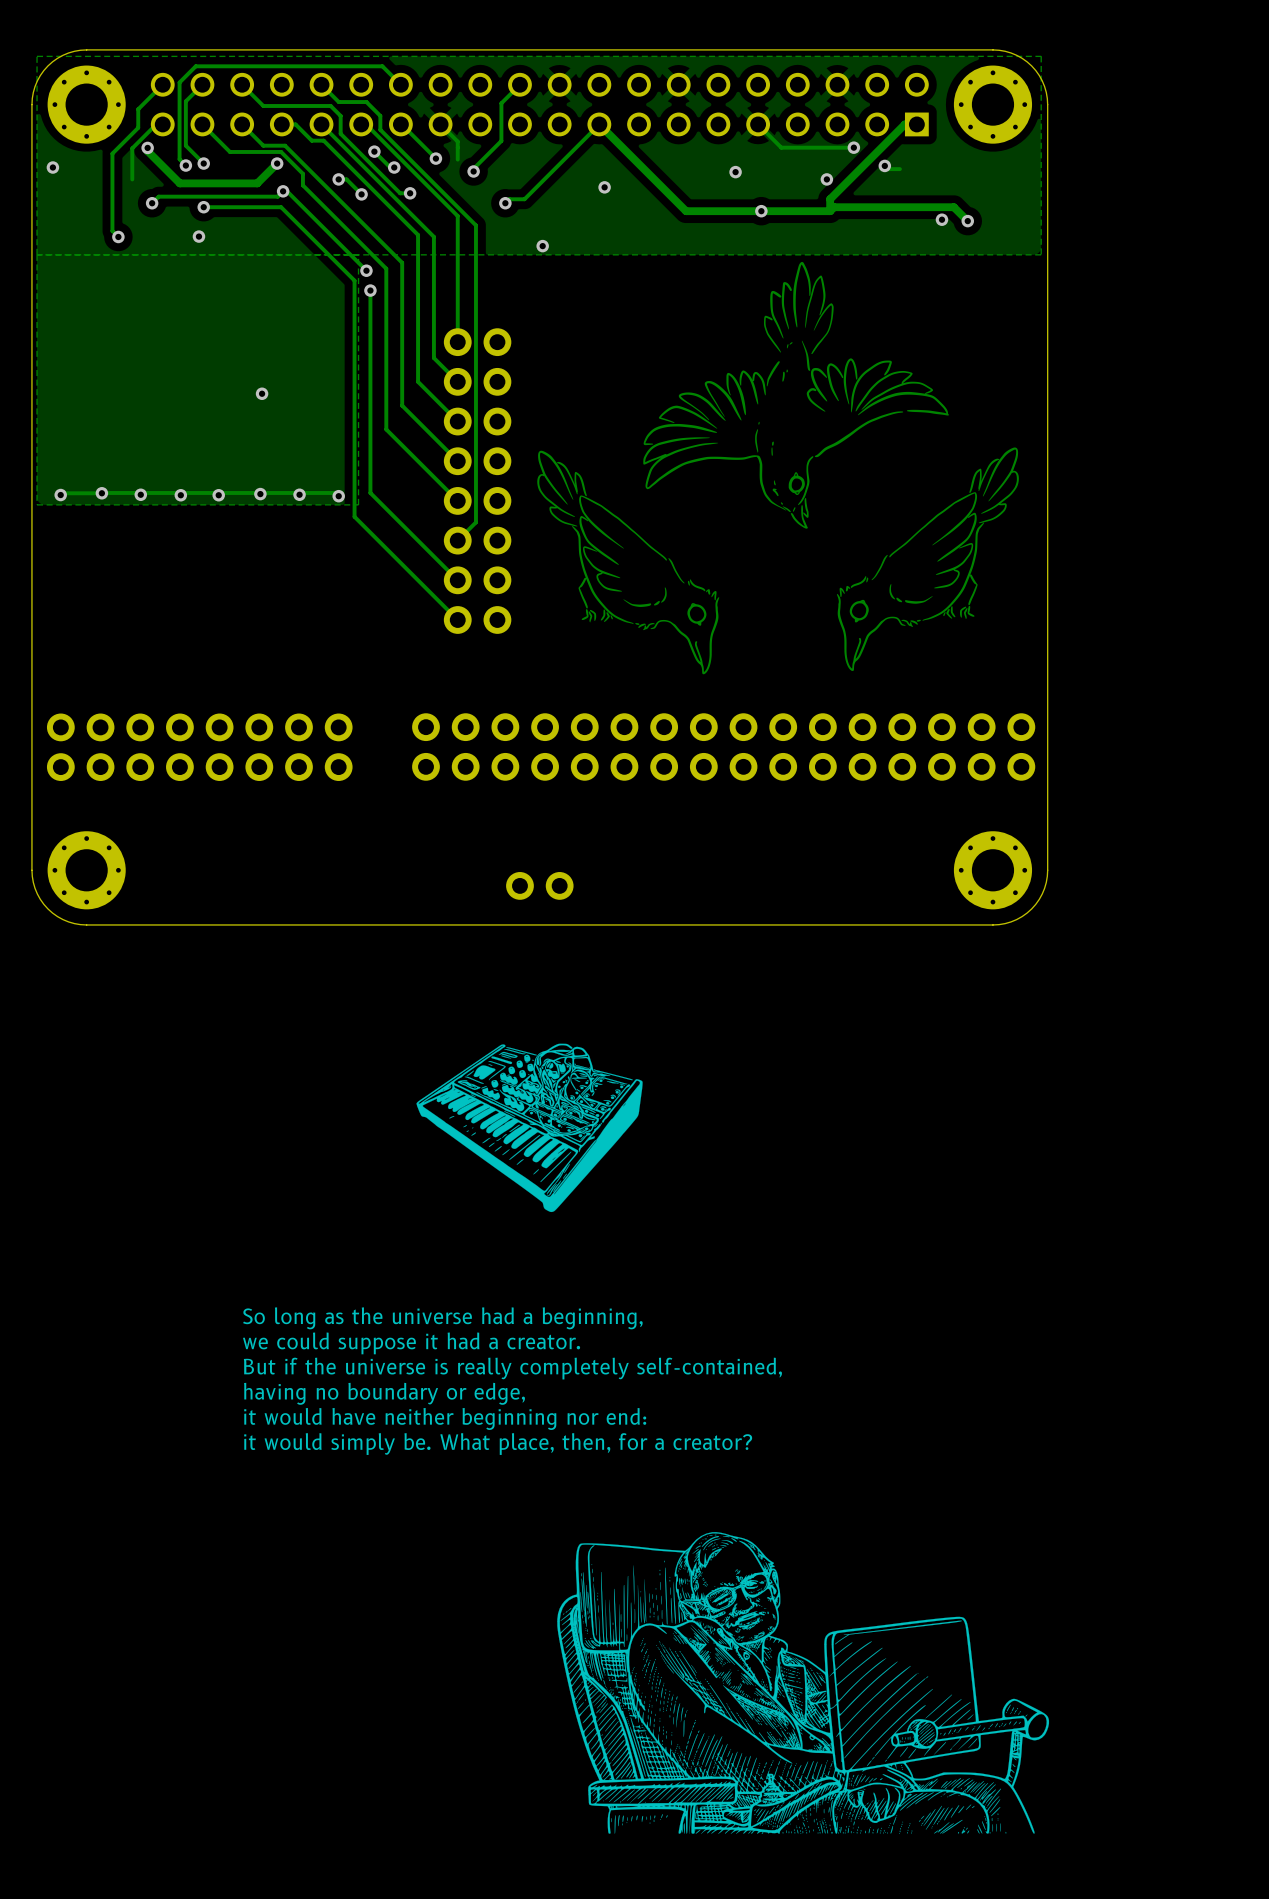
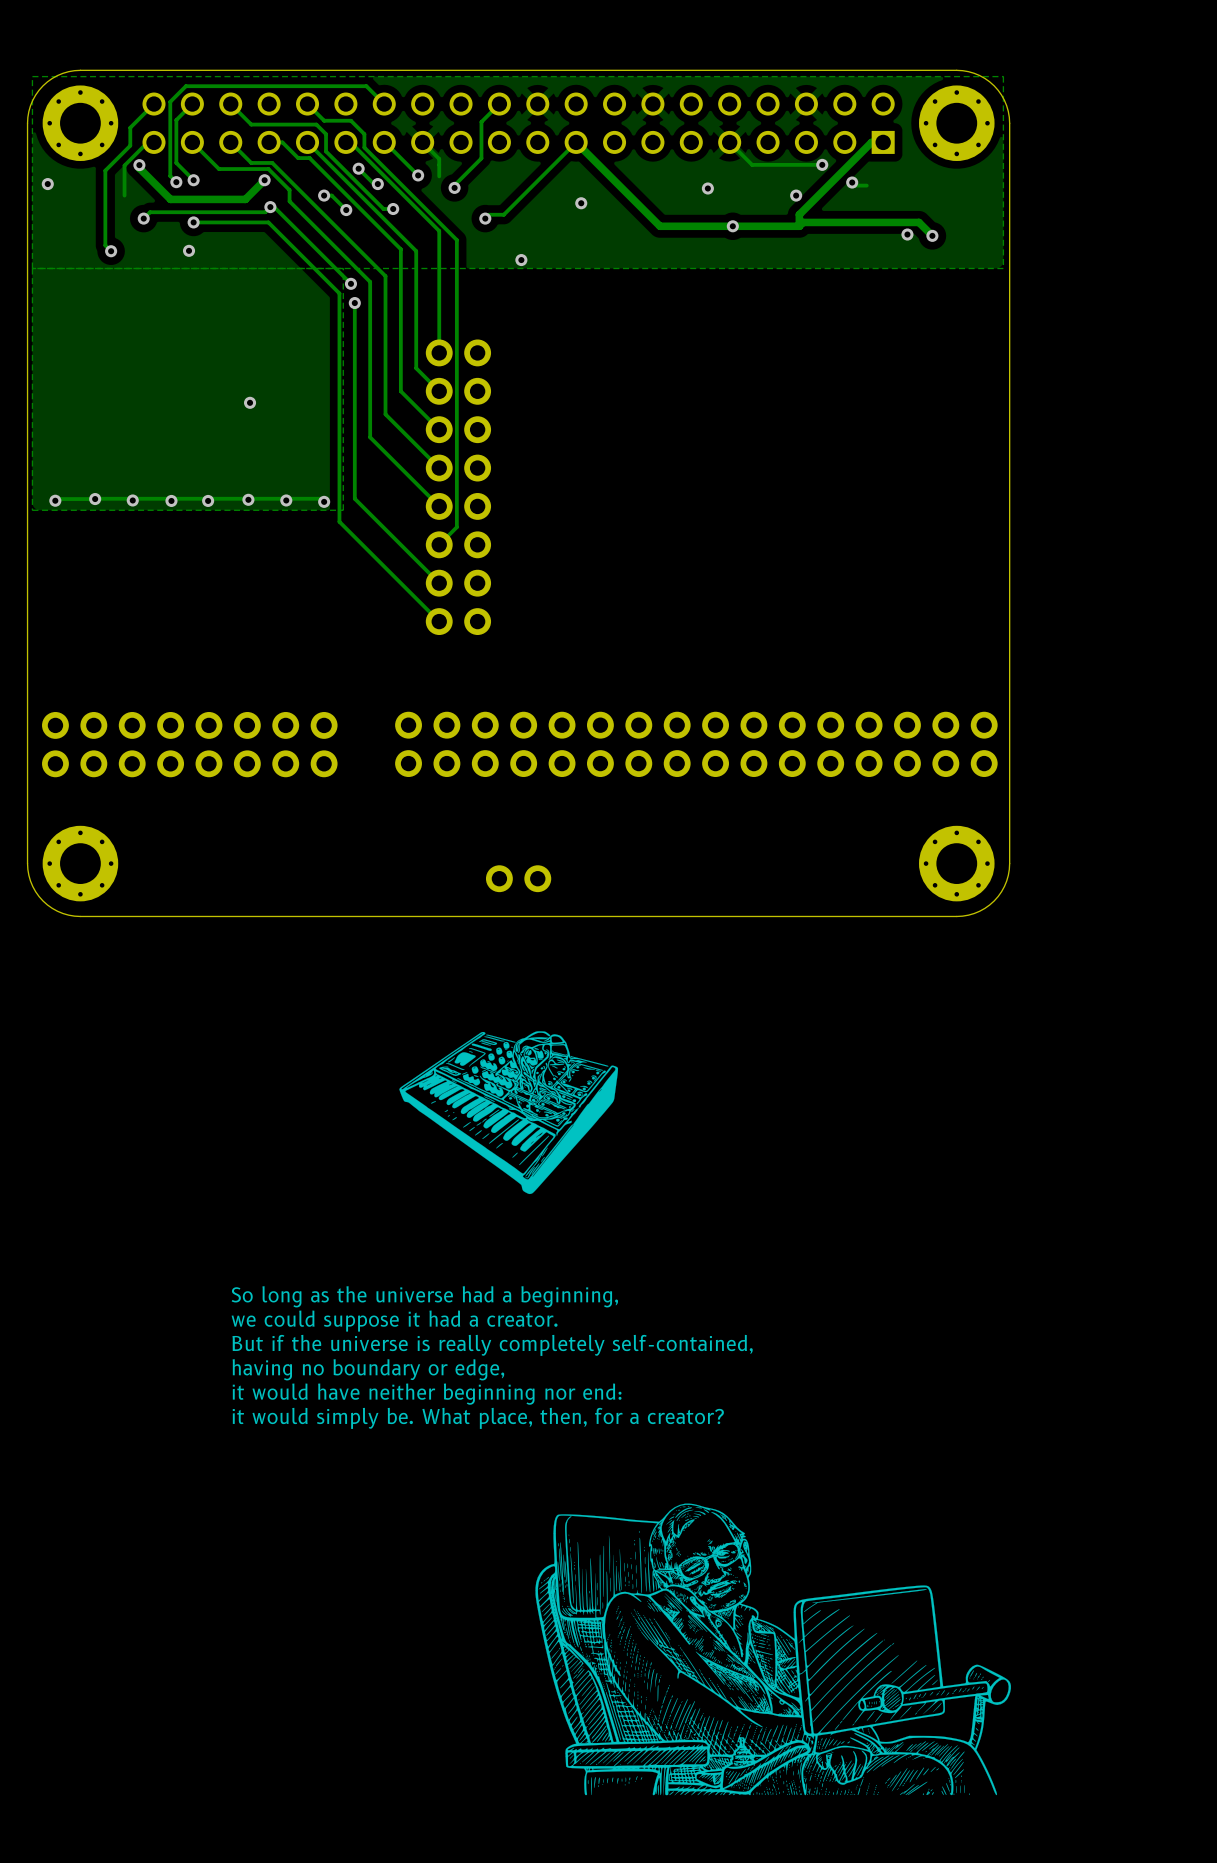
drawing: [537, 261, 1019, 675] -> none

